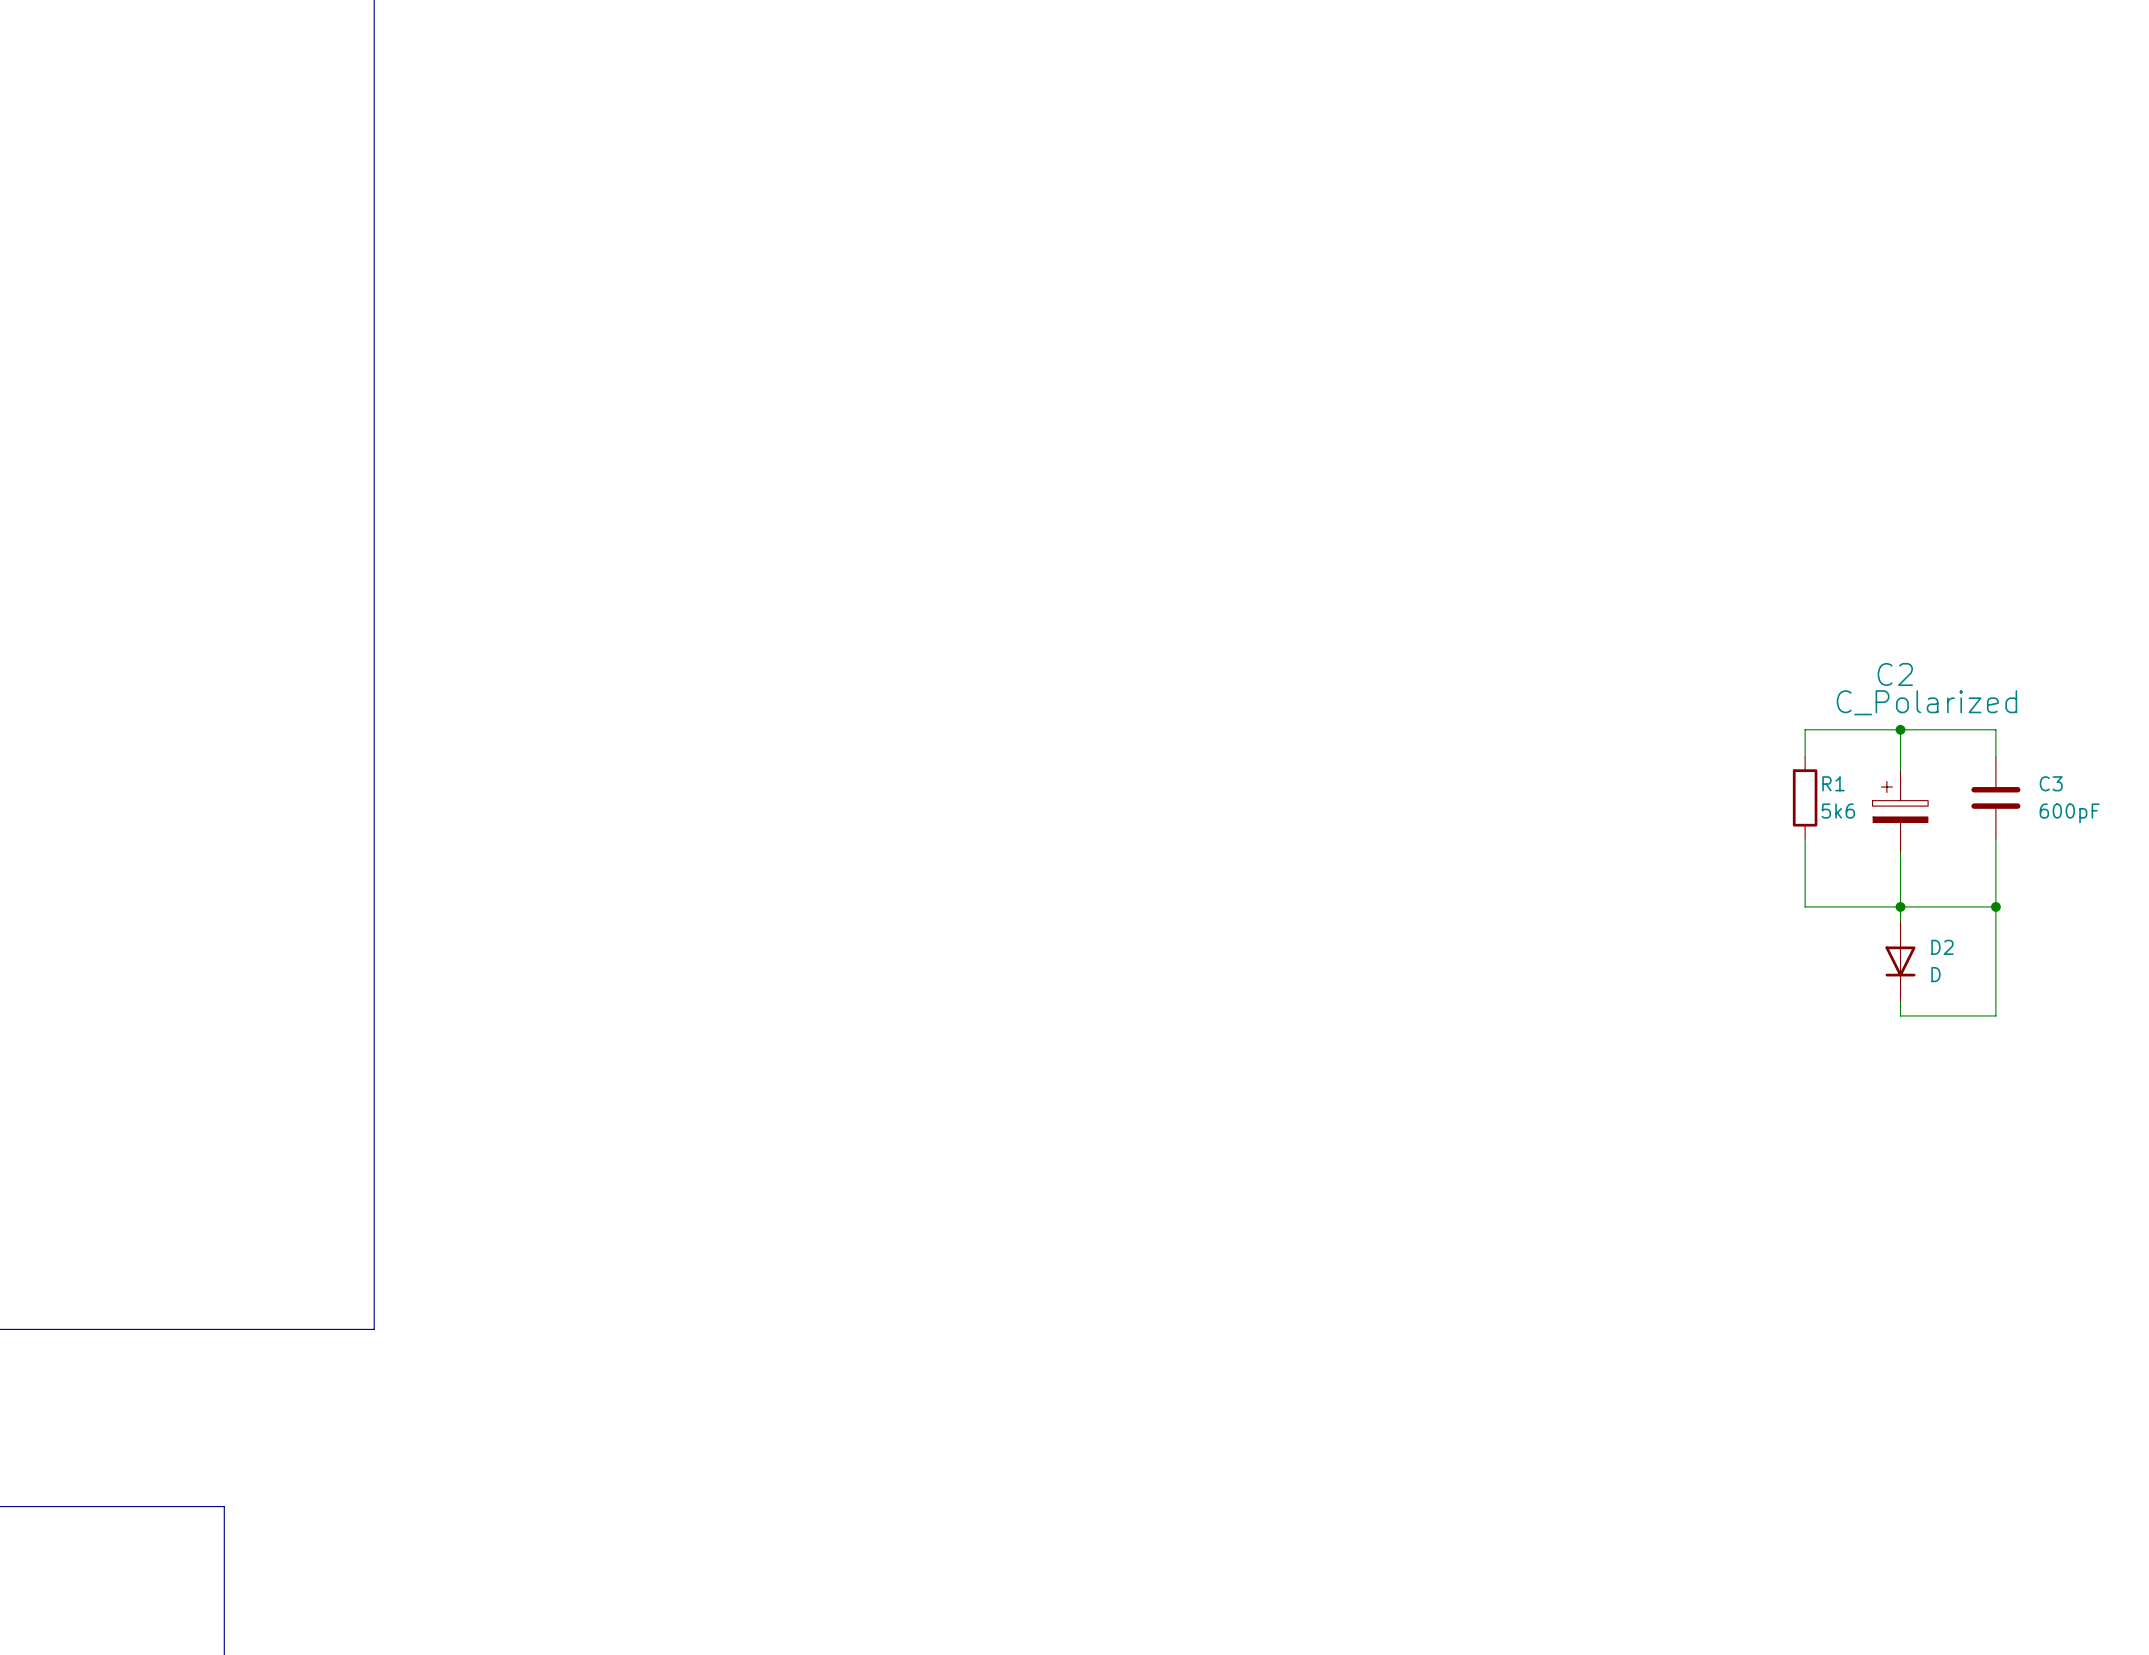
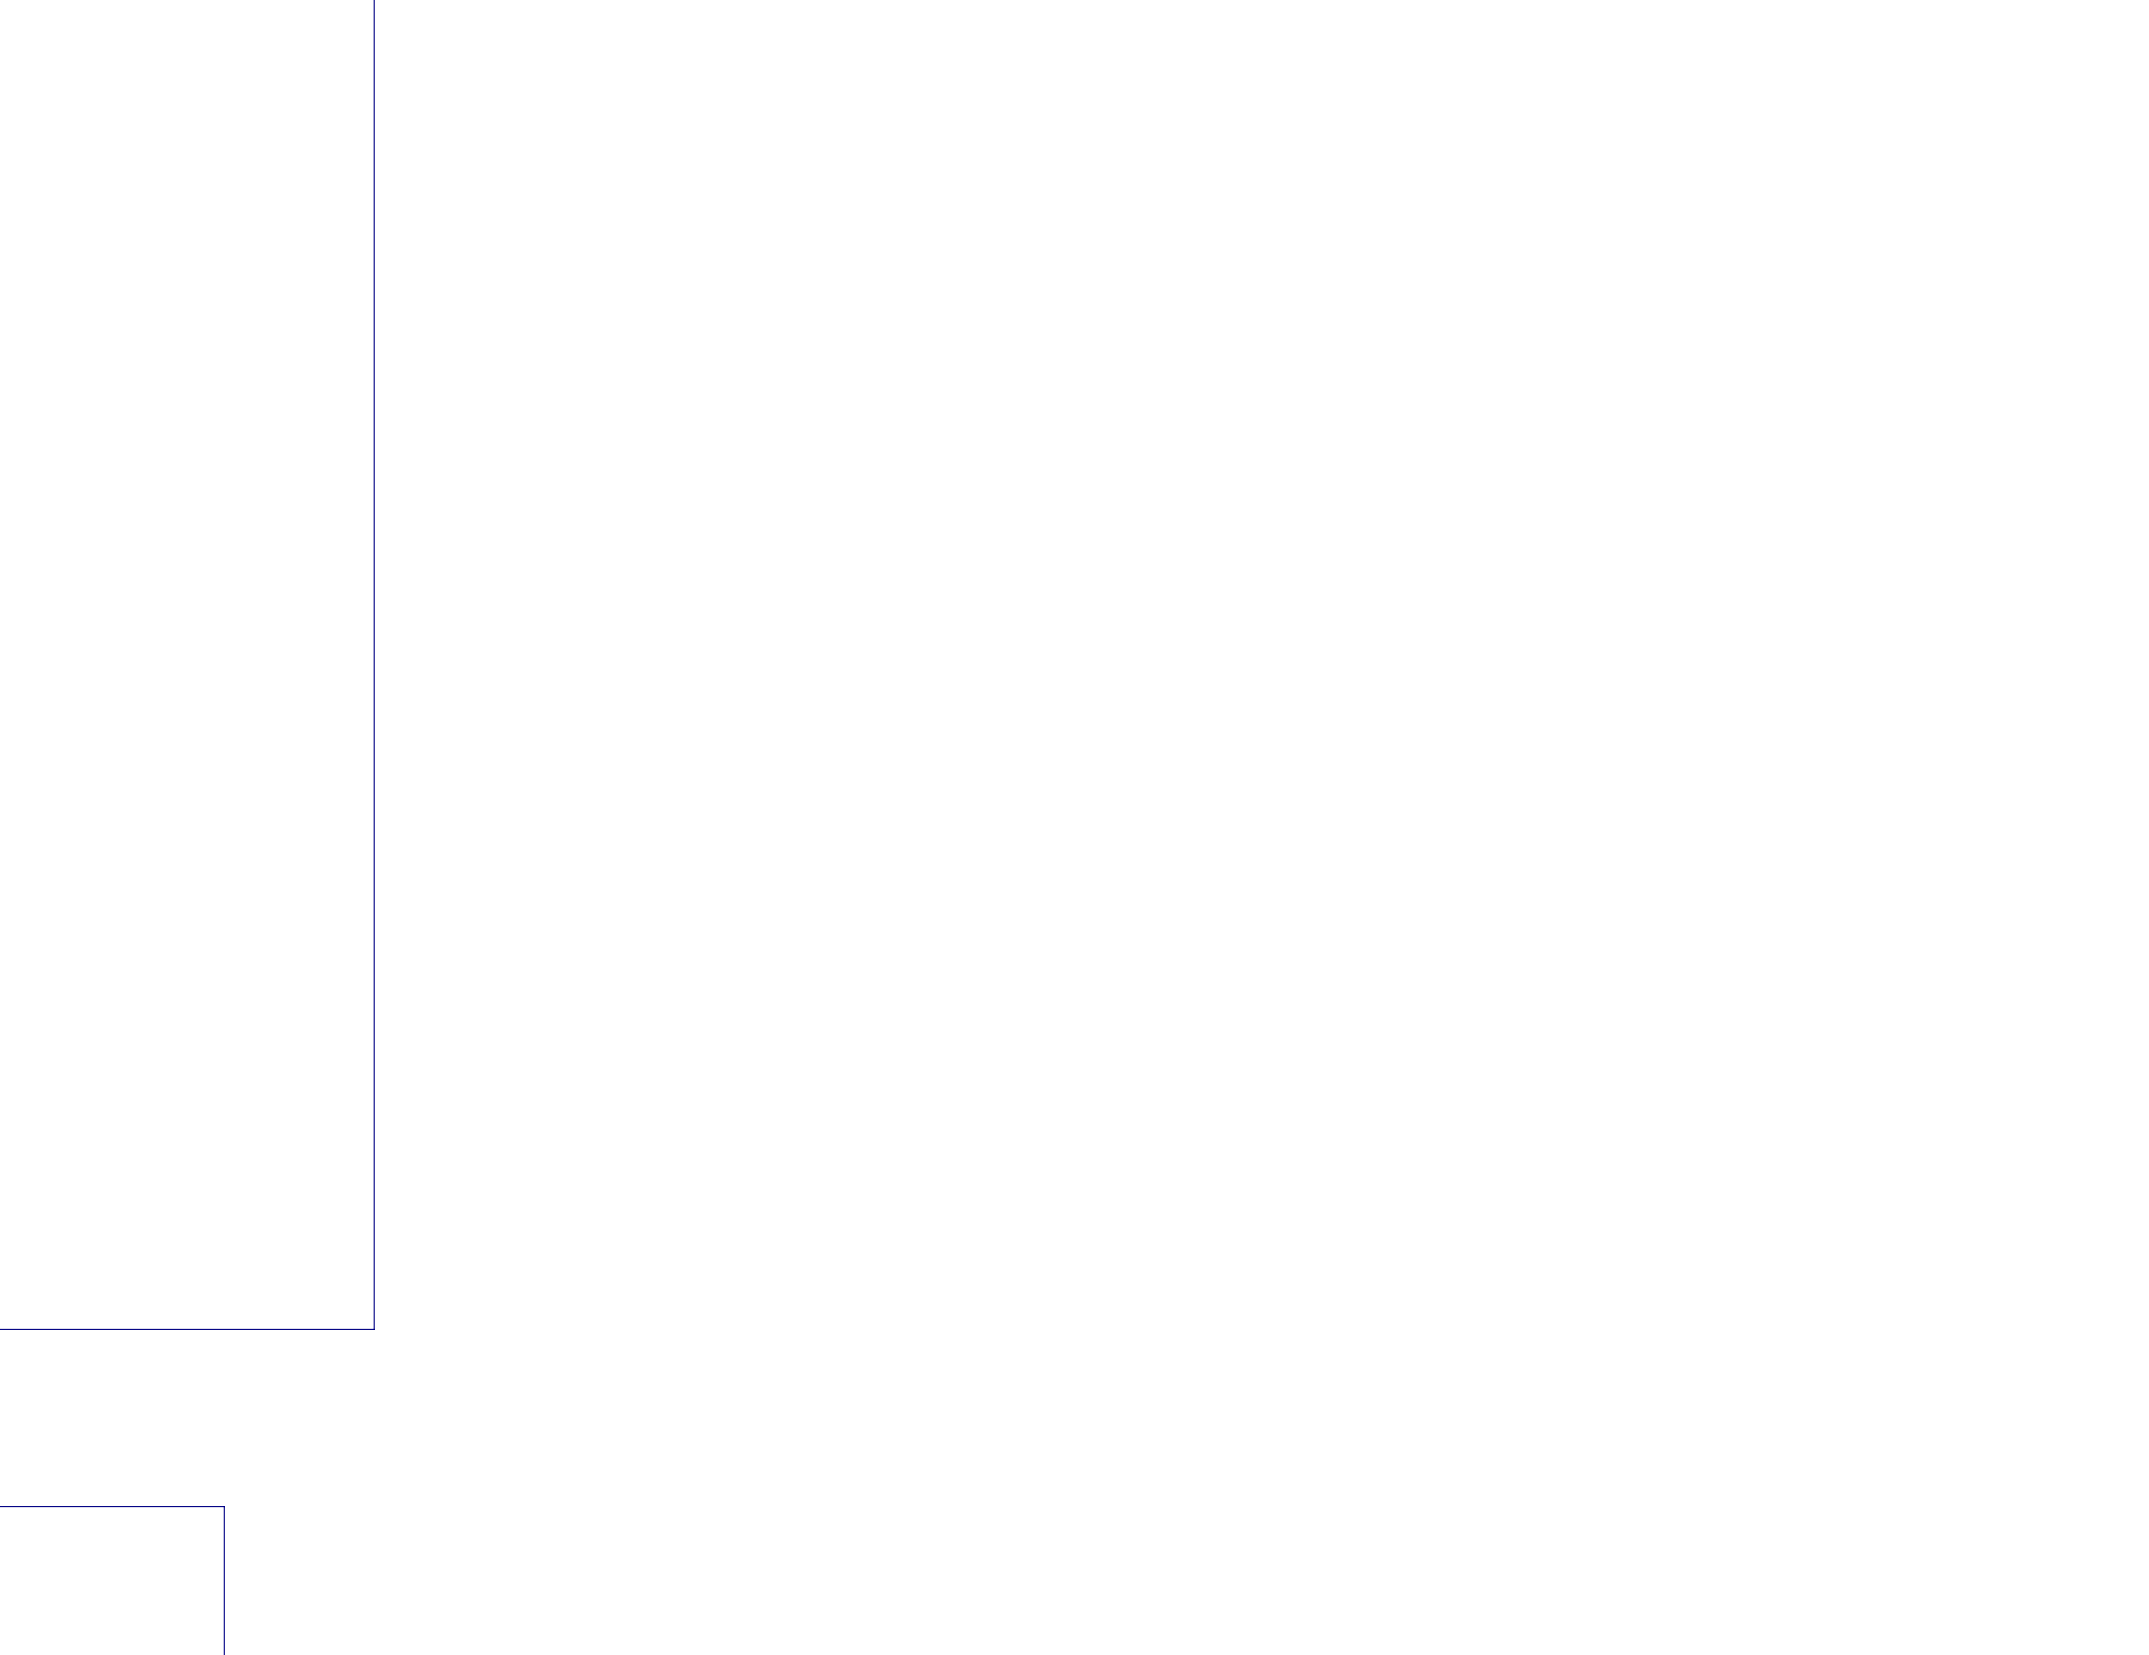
wire: (1900, 729) (1900, 770) -> none
junction: (1900, 729) -> none
wire: (1805, 757) (1805, 729) (1995, 729) (1995, 757) -> none
R1: 5k6 (1805, 797) -> none
C3: 600pF (1995, 797) -> none
C2: C_Polarized (1900, 811) -> none
wire: (1805, 838) (1805, 906) (1995, 906) -> none
wire: (1995, 838) (1995, 1015) (1900, 1015) (1900, 1002) -> none
wire: (1900, 852) (1900, 920) -> none
junction: (1900, 906) -> none
junction: (1995, 906) -> none
D2: D (1900, 961) -> none

